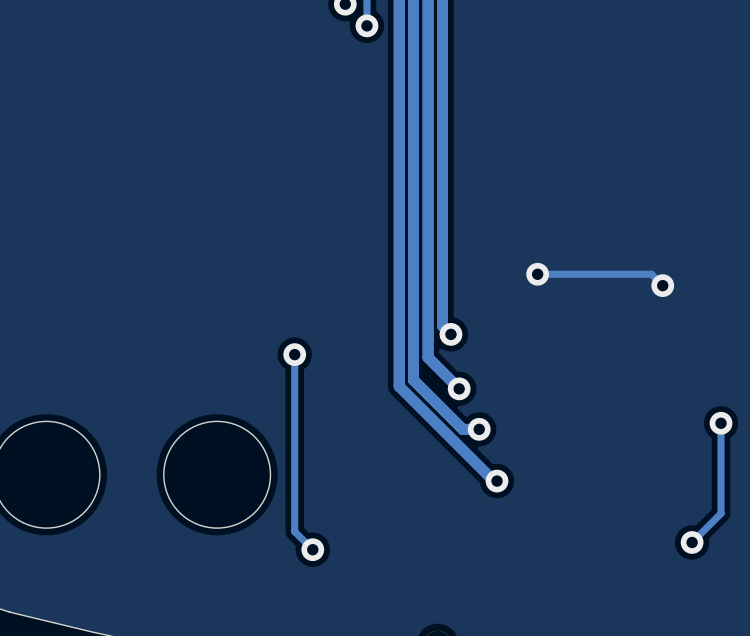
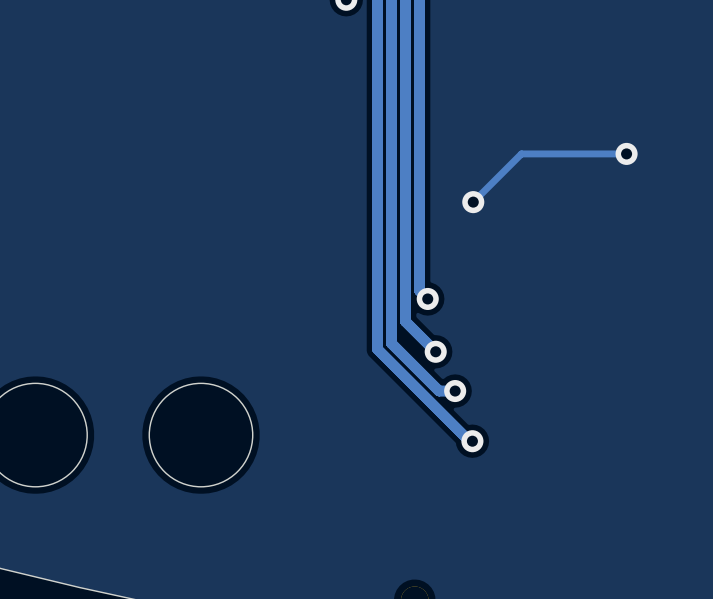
track: none -> (626, 153) (521, 153) (473, 202)
via: none -> (626, 153)
track: (537, 274) (651, 274) (662, 285) -> none
via position: (537, 274) -> (473, 202)
via: (662, 285) -> none
track: (294, 354) (294, 531) (312, 549) -> none
via: (294, 354) -> none
track: (721, 423) (721, 513) (692, 542) -> none
via: (721, 423) -> none
via: (692, 542) -> none
via: (312, 549) -> none

